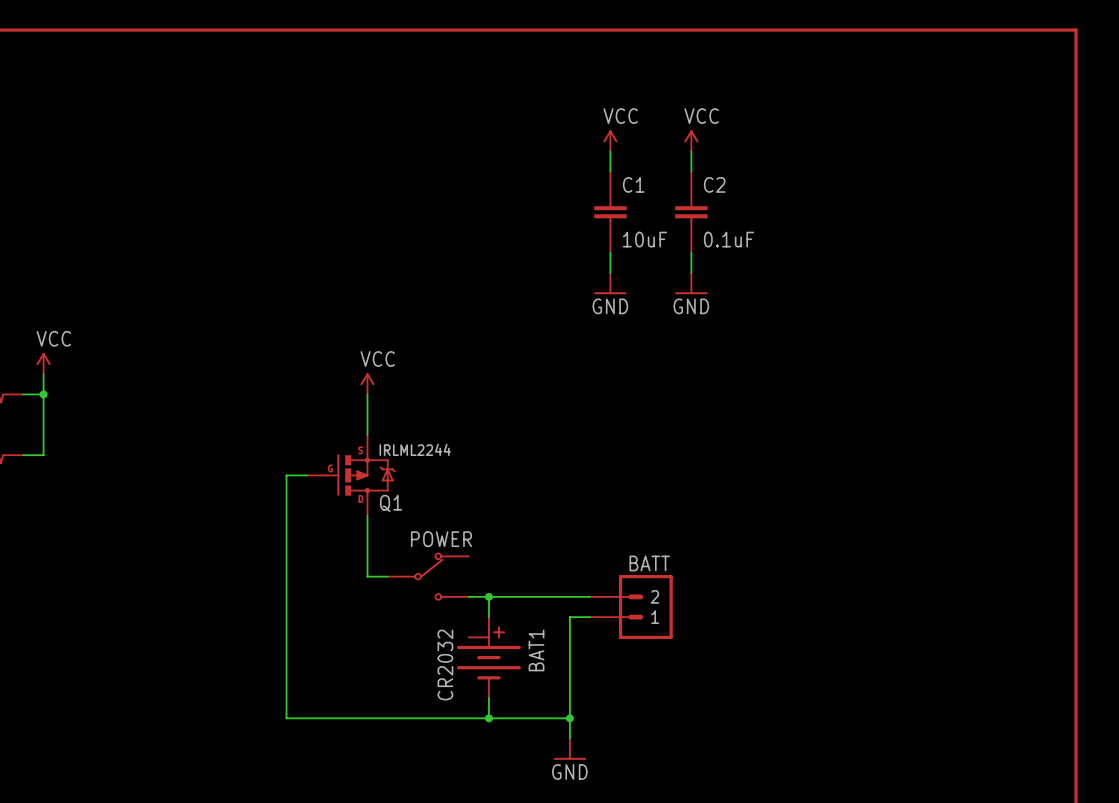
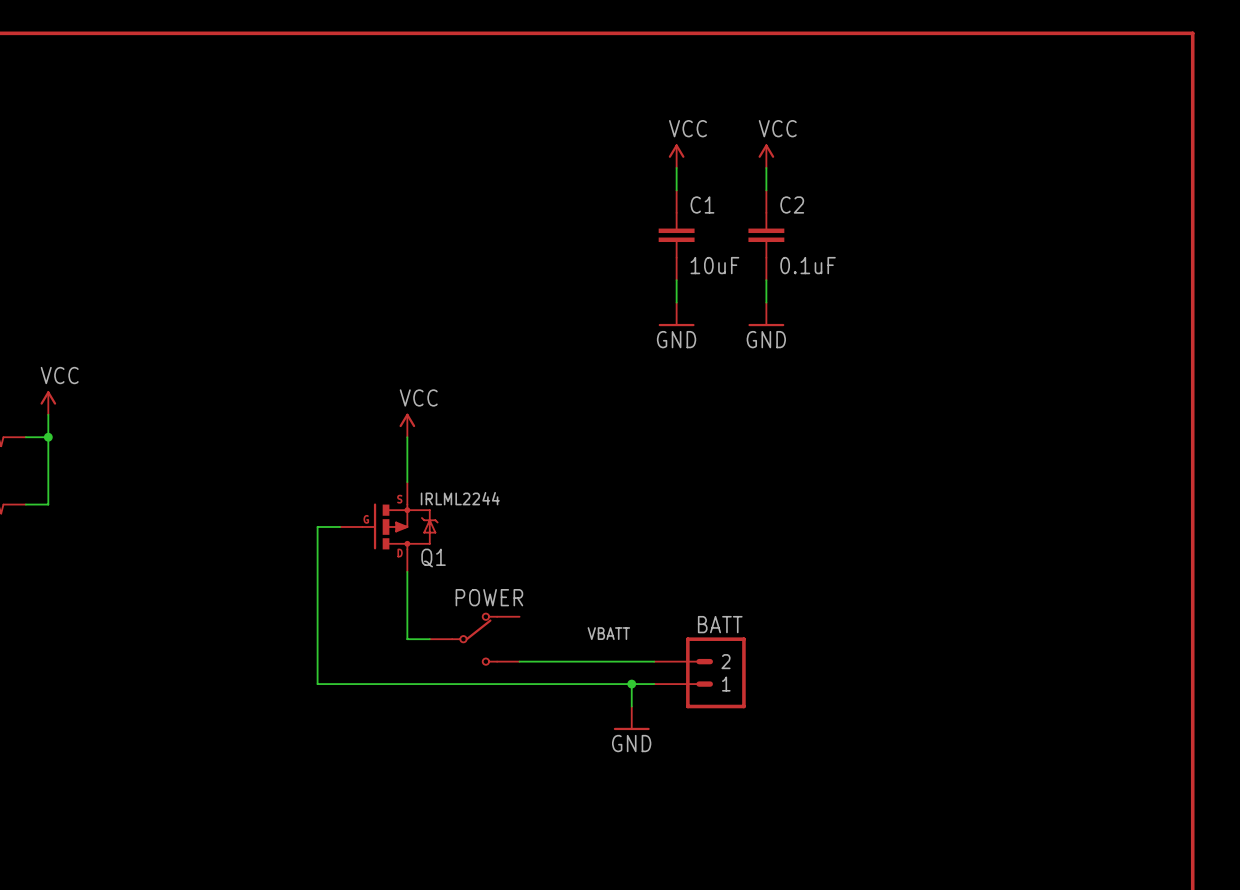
label: none -> VBATT (608, 633)
wire: (488, 596) (488, 617) -> none
junction: (488, 596) -> none
wire: (286, 617) (286, 718) (569, 718) -> (317, 684) (631, 684)
junction: none -> (631, 684)
wire: (569, 637) (569, 738) -> none
BAT1: CR2032 (488, 657) -> none
wire: (488, 698) (488, 718) -> none
junction: (488, 718) -> none
junction: (569, 718) -> none
power symbol position: GND (569, 749) -> GND (631, 718)

